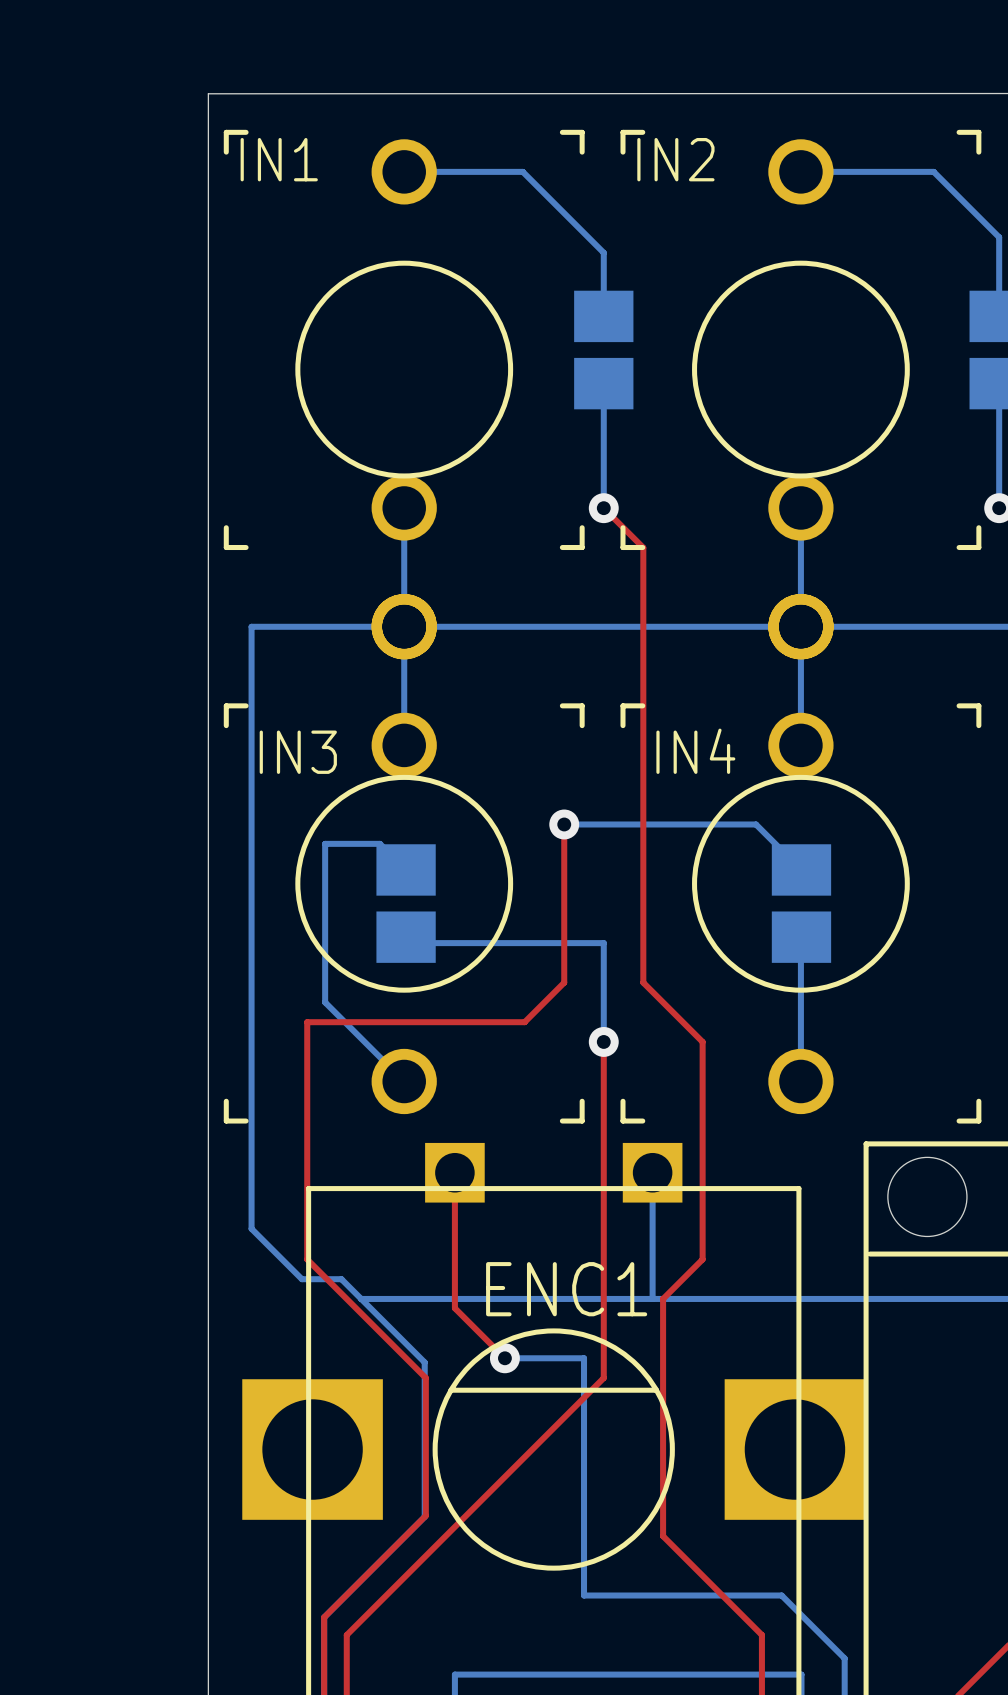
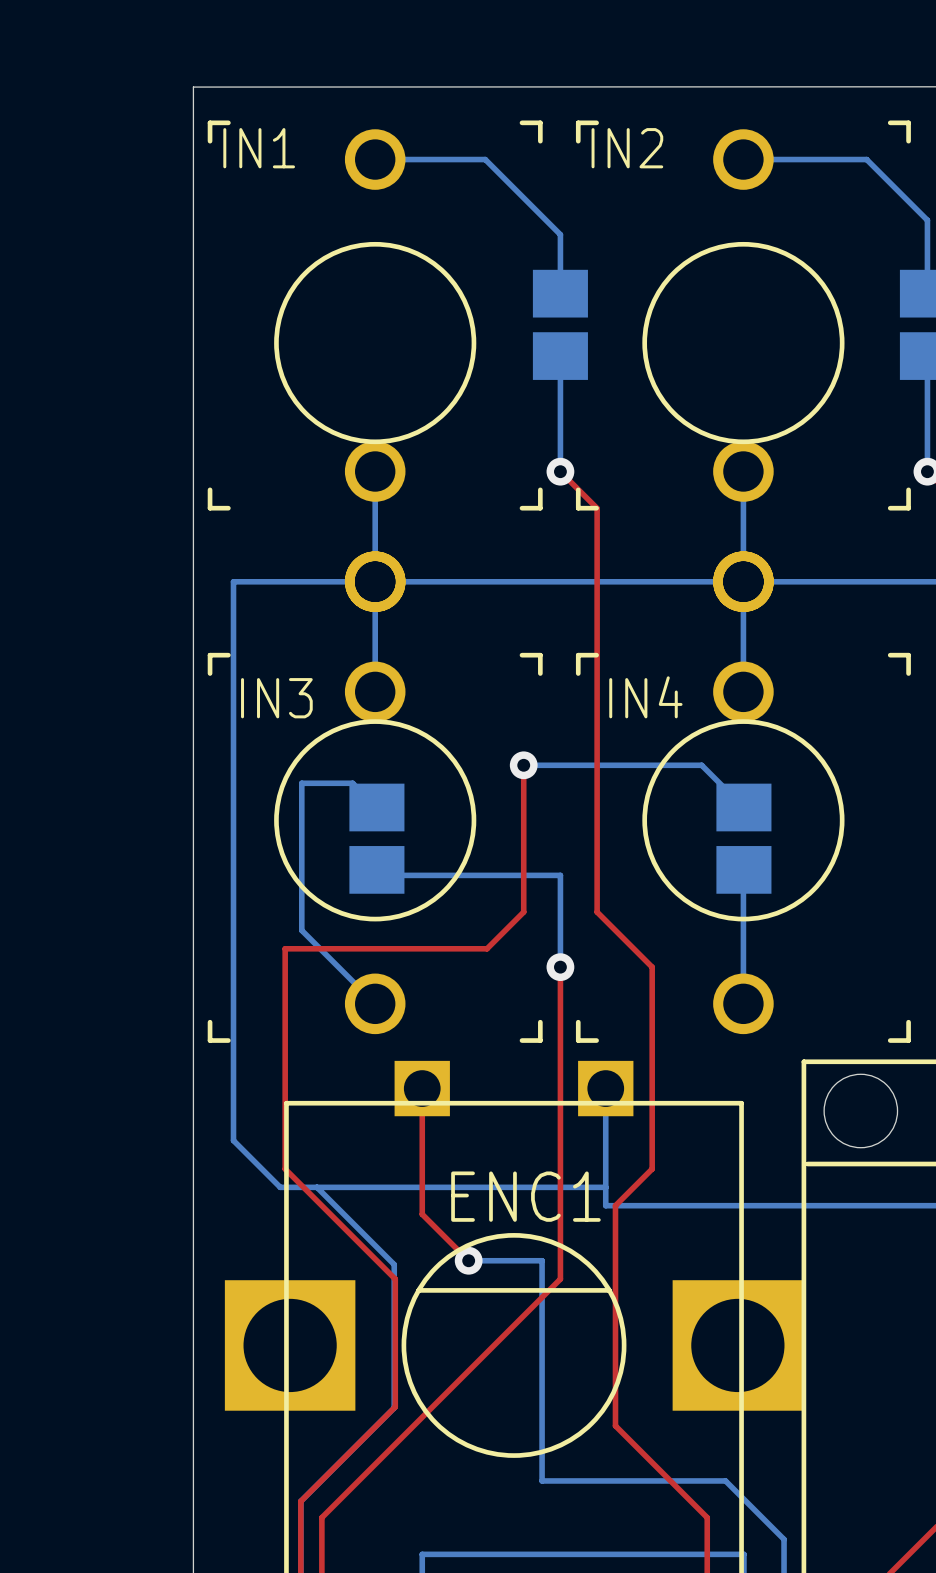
bottom track: none -> (316, 1187) (605, 1187)
bottom track: (361, 1298) (652, 1298) -> none

